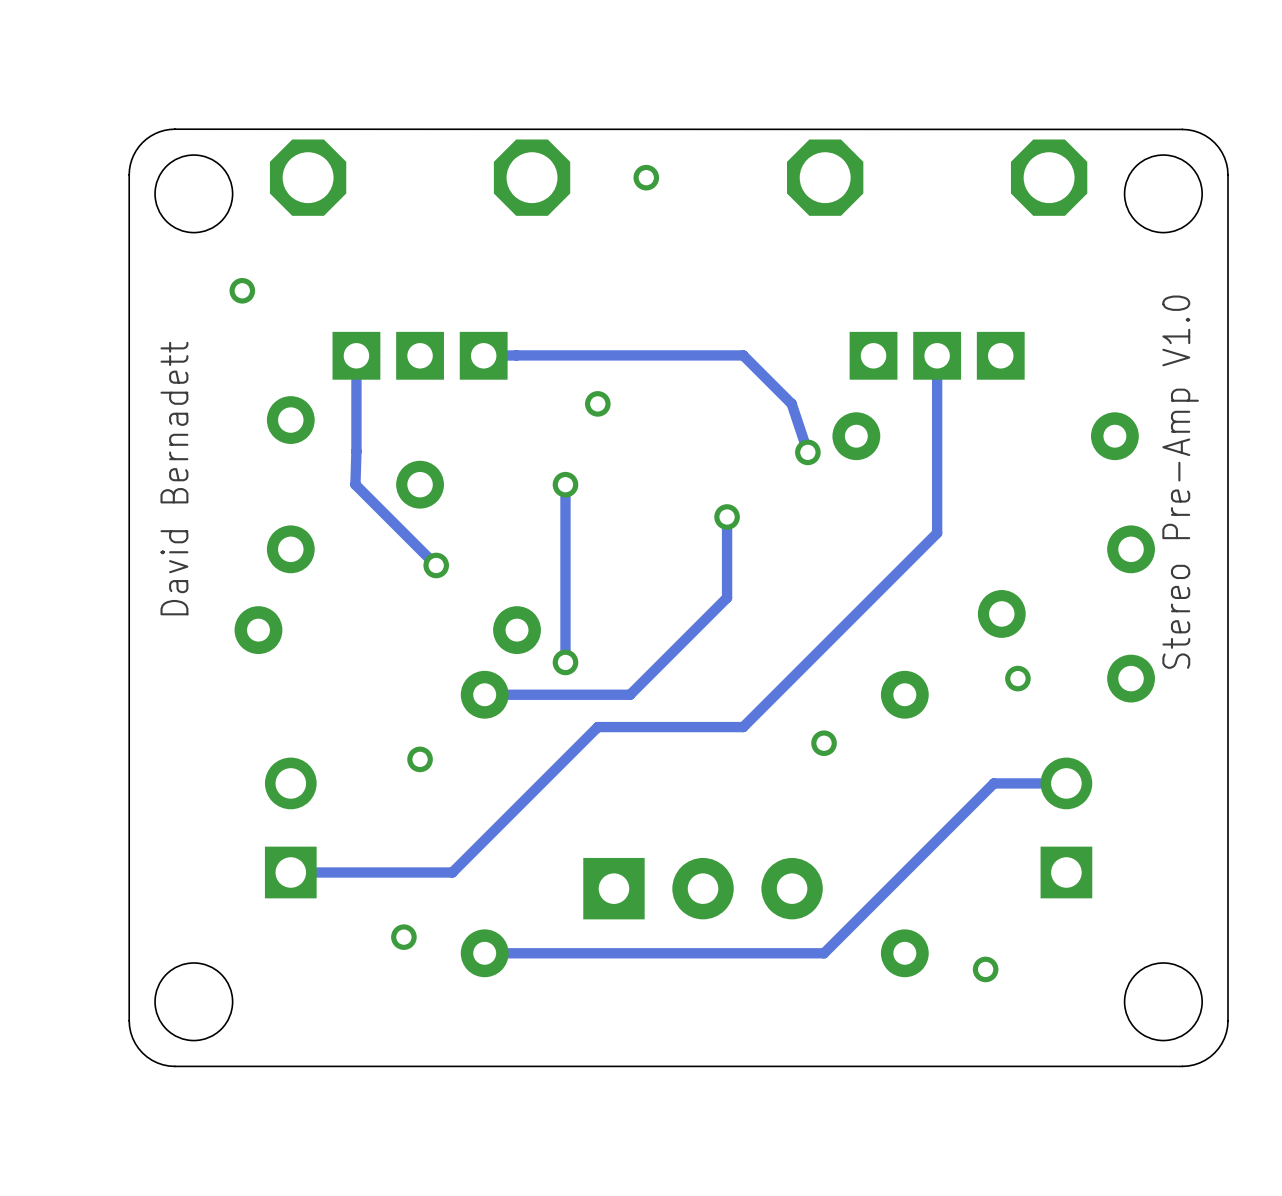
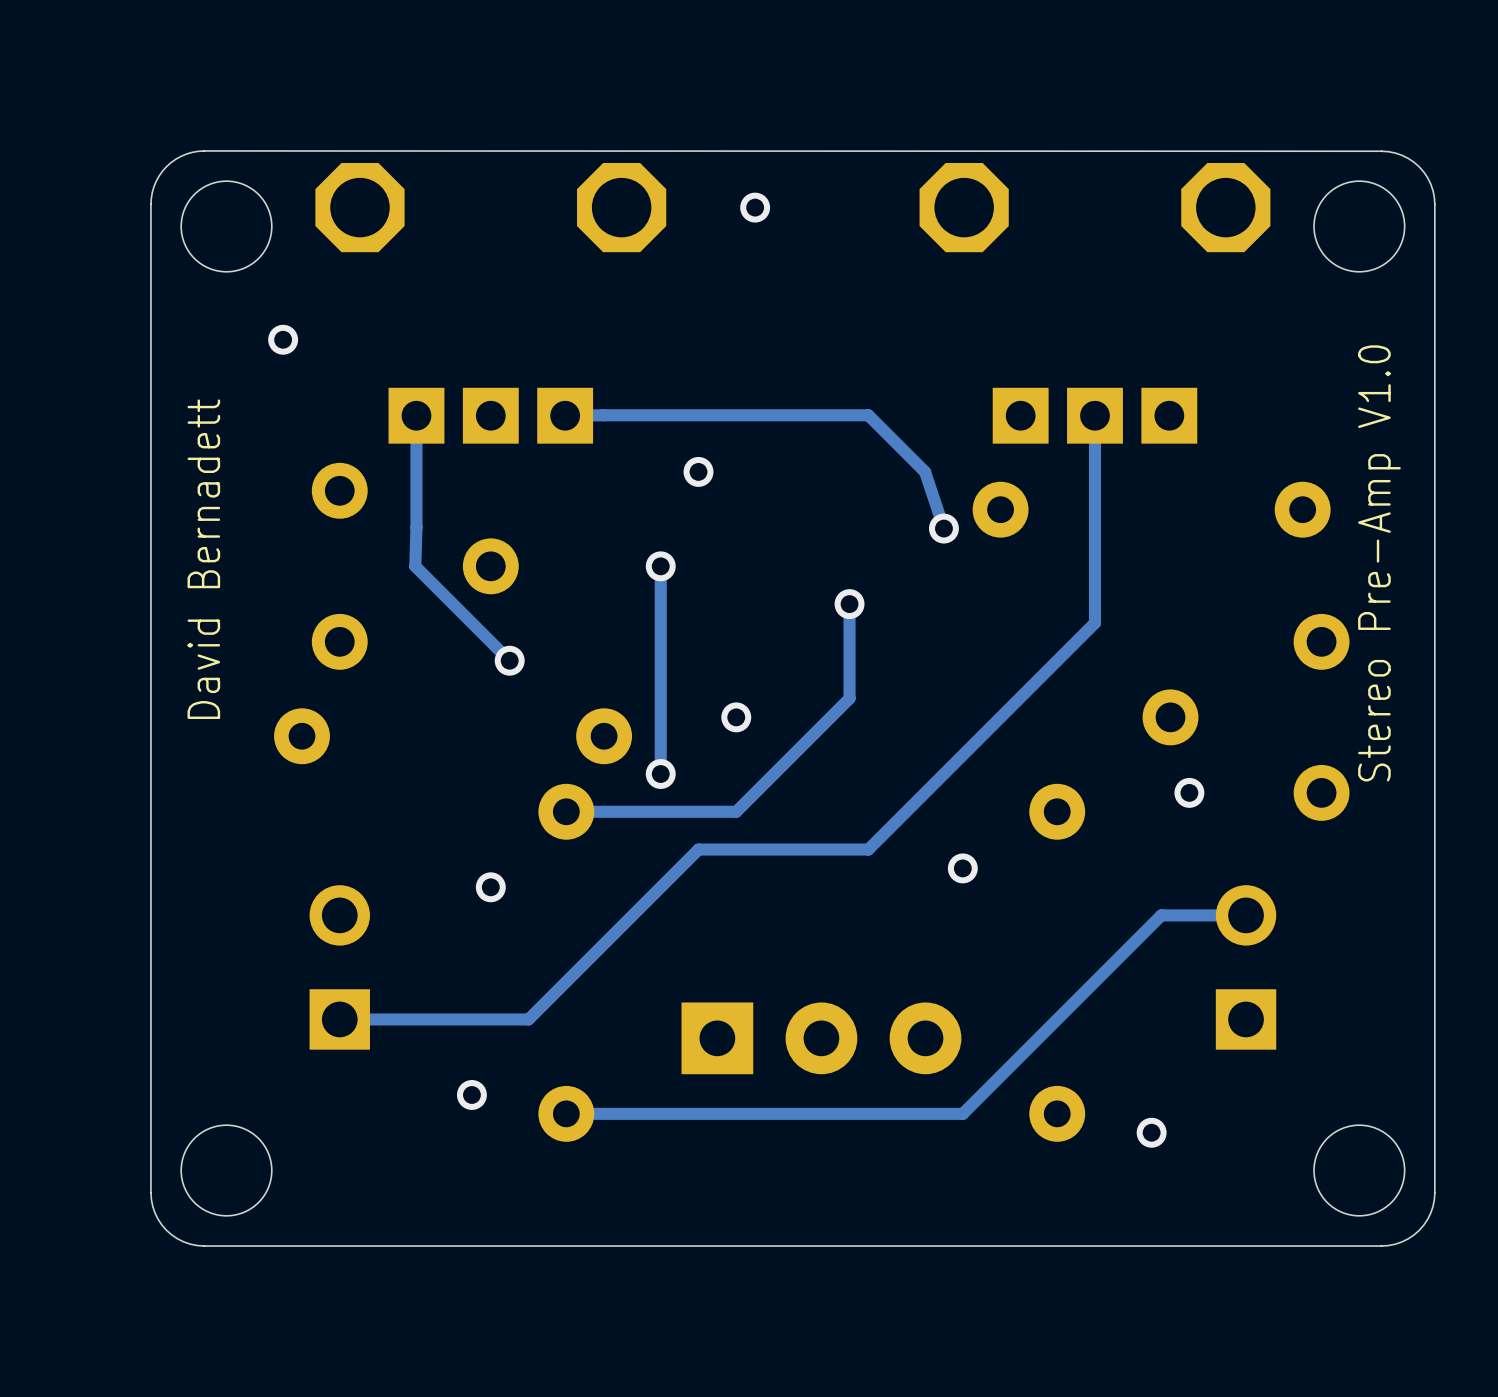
via: none -> (736, 717)

